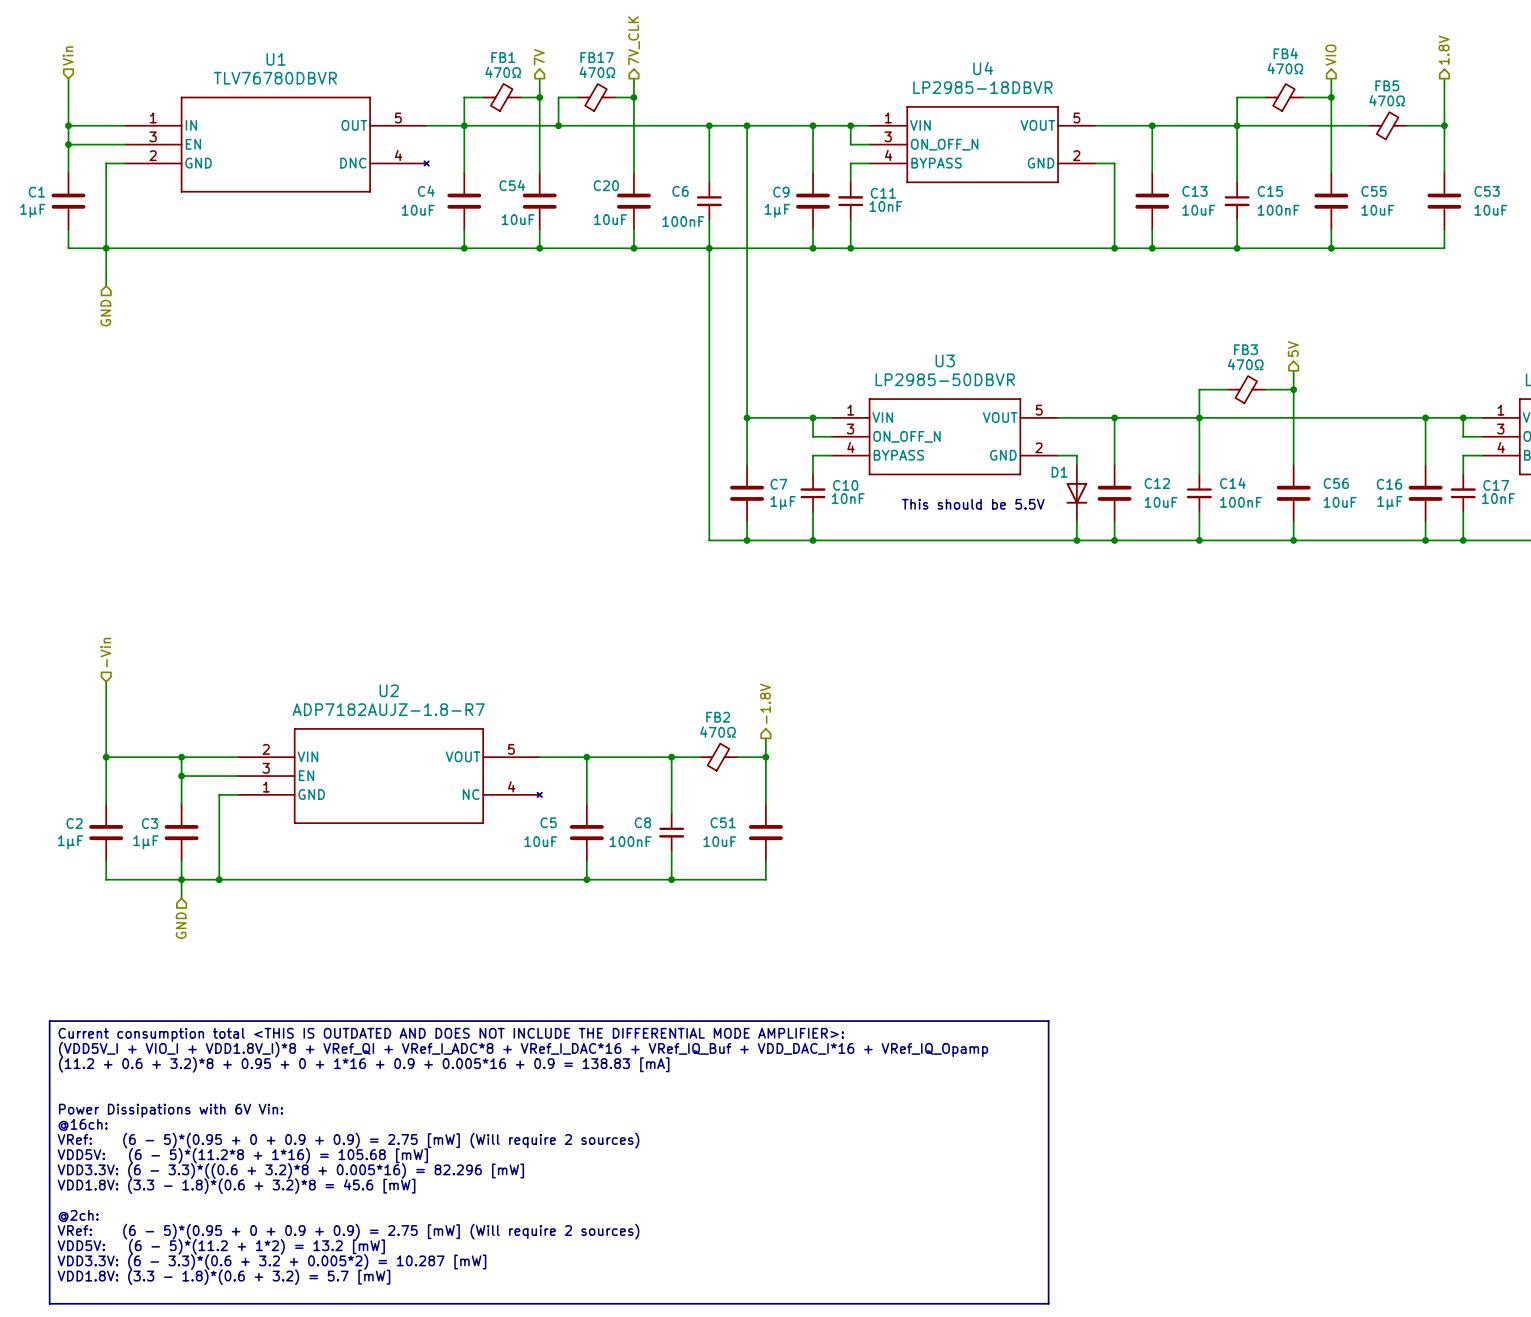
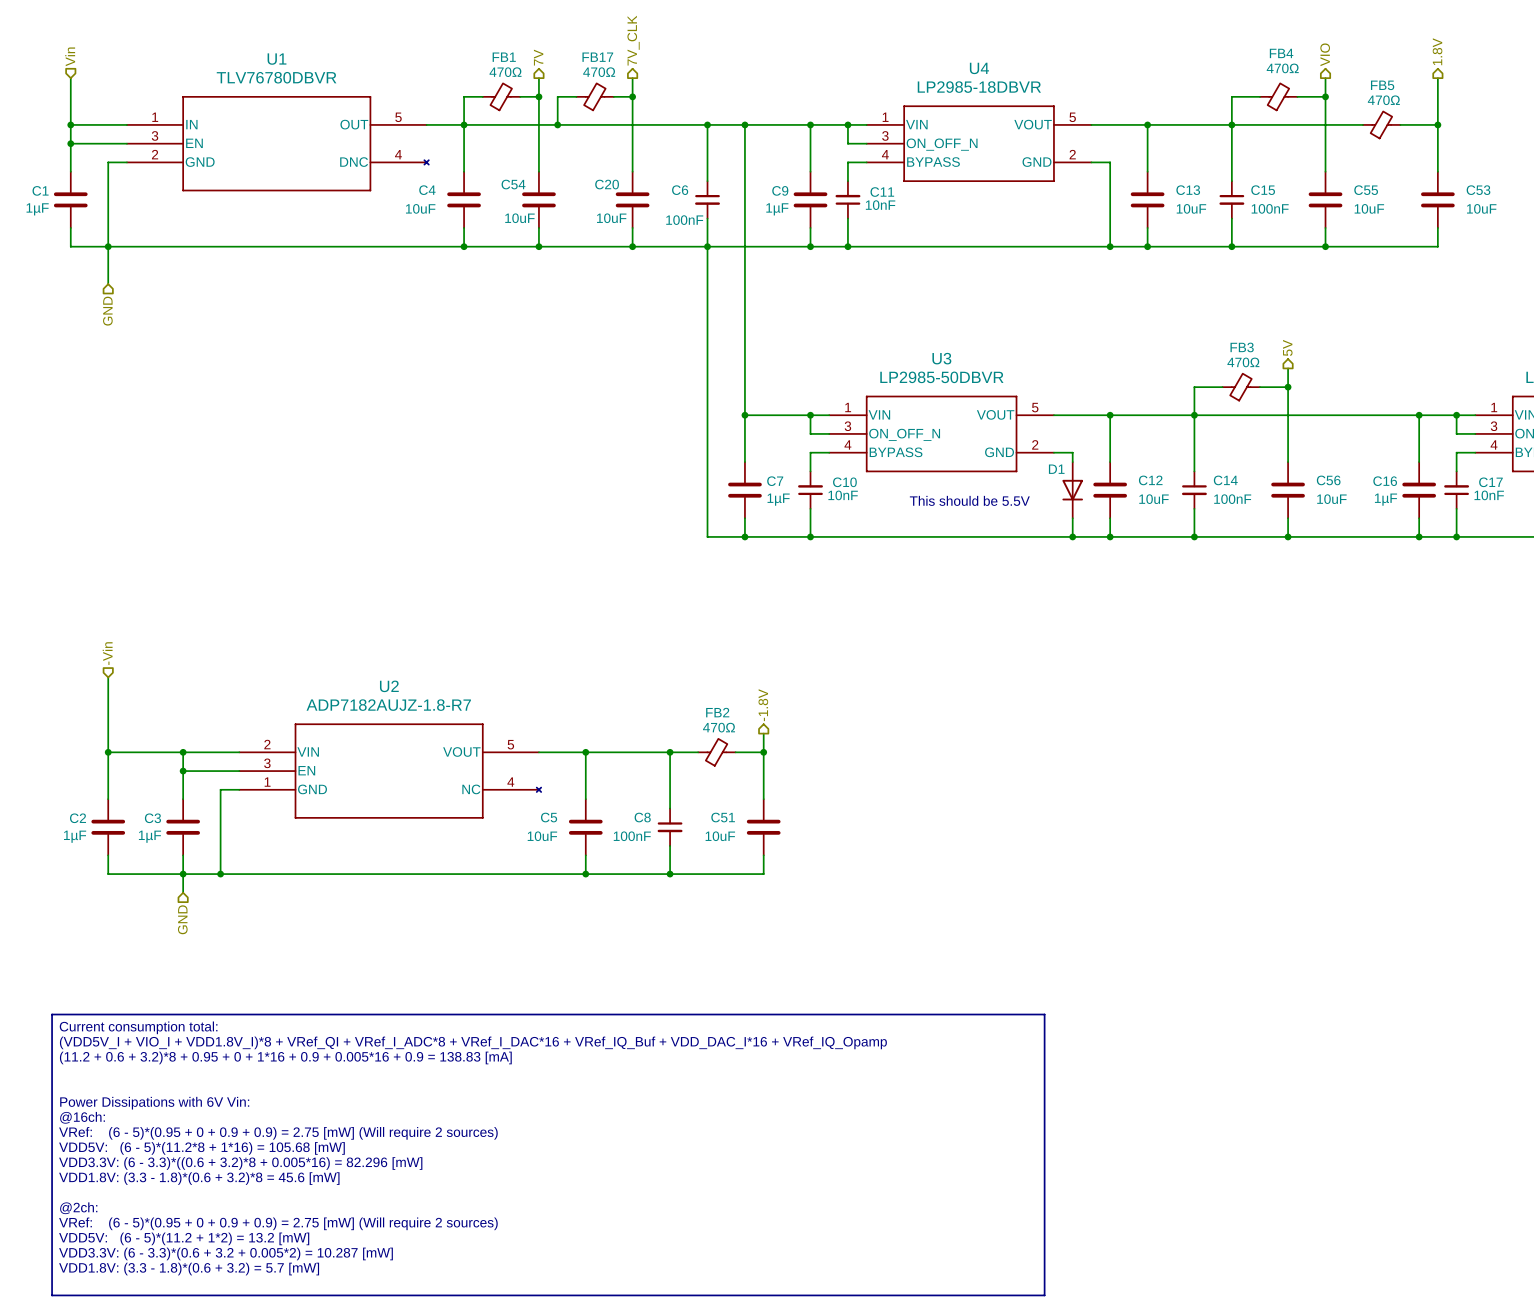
text: Current consumption total <THIS IS OUTDATED AND DOES NOT INCLUDE THE DIFFERENTIAL MODE AMPLIFIER>: (451, 1034) -> Current consumption total: (138, 1027)

